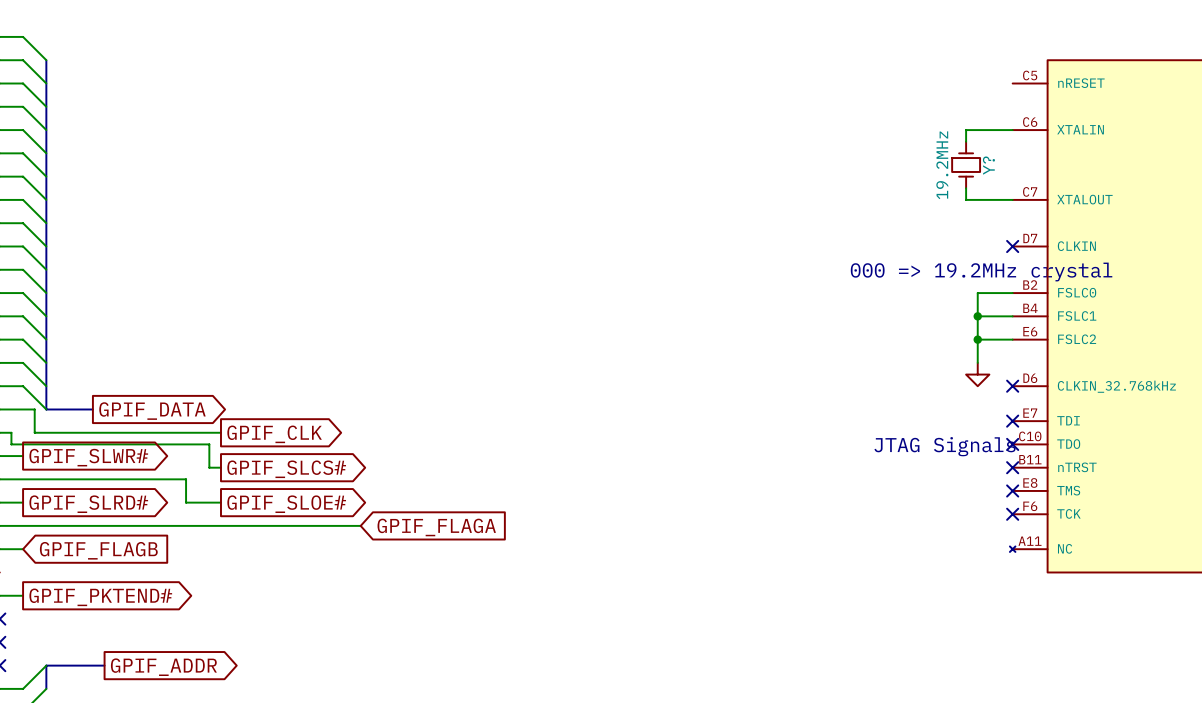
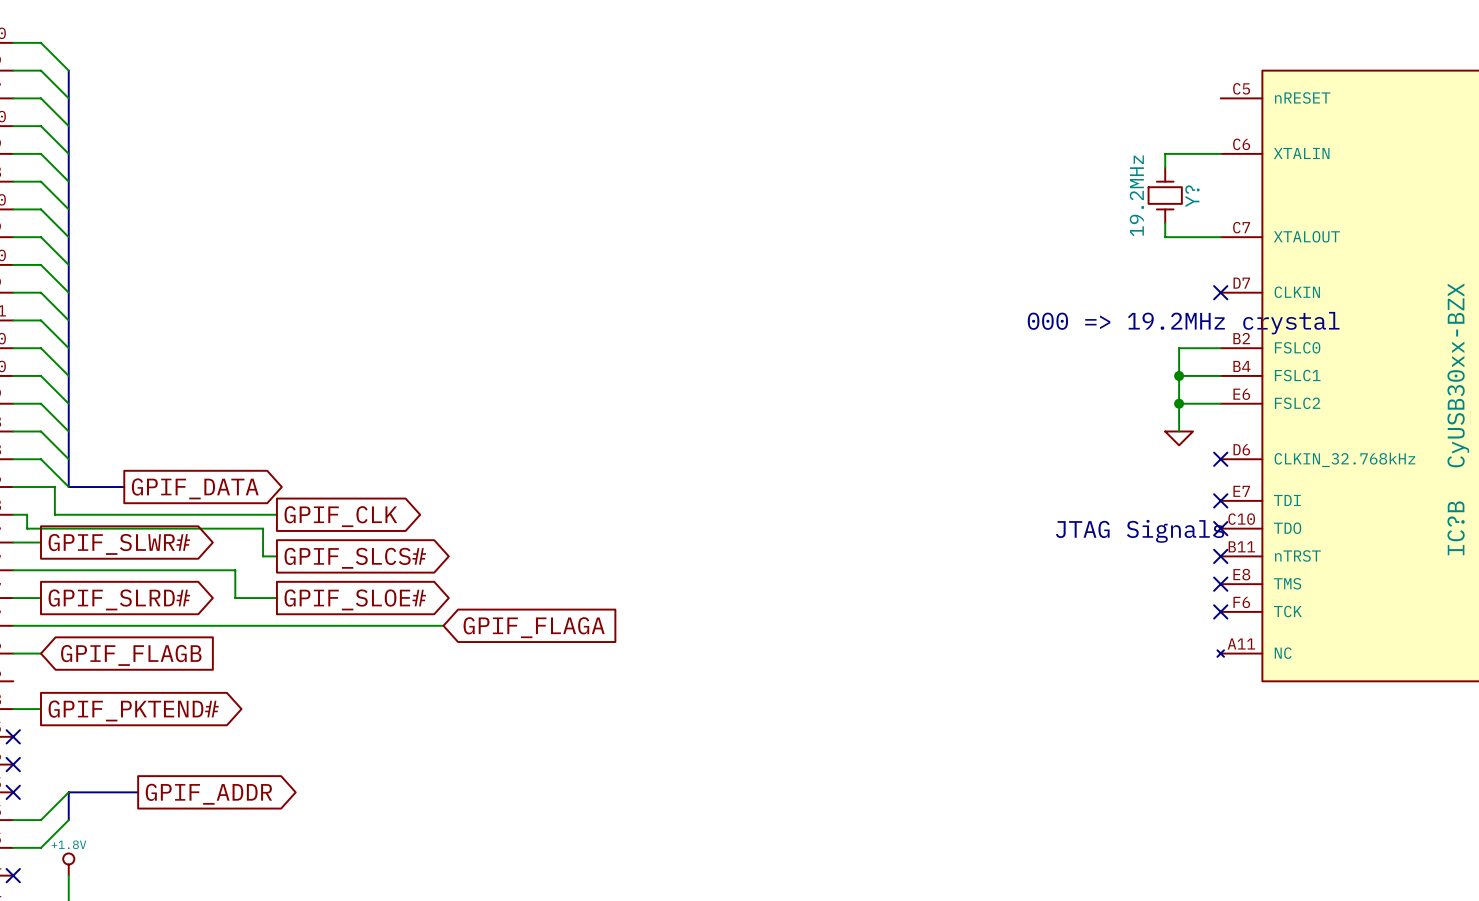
power symbol shape: [966, 362, 990, 387] -> [1165, 431, 1193, 446]

